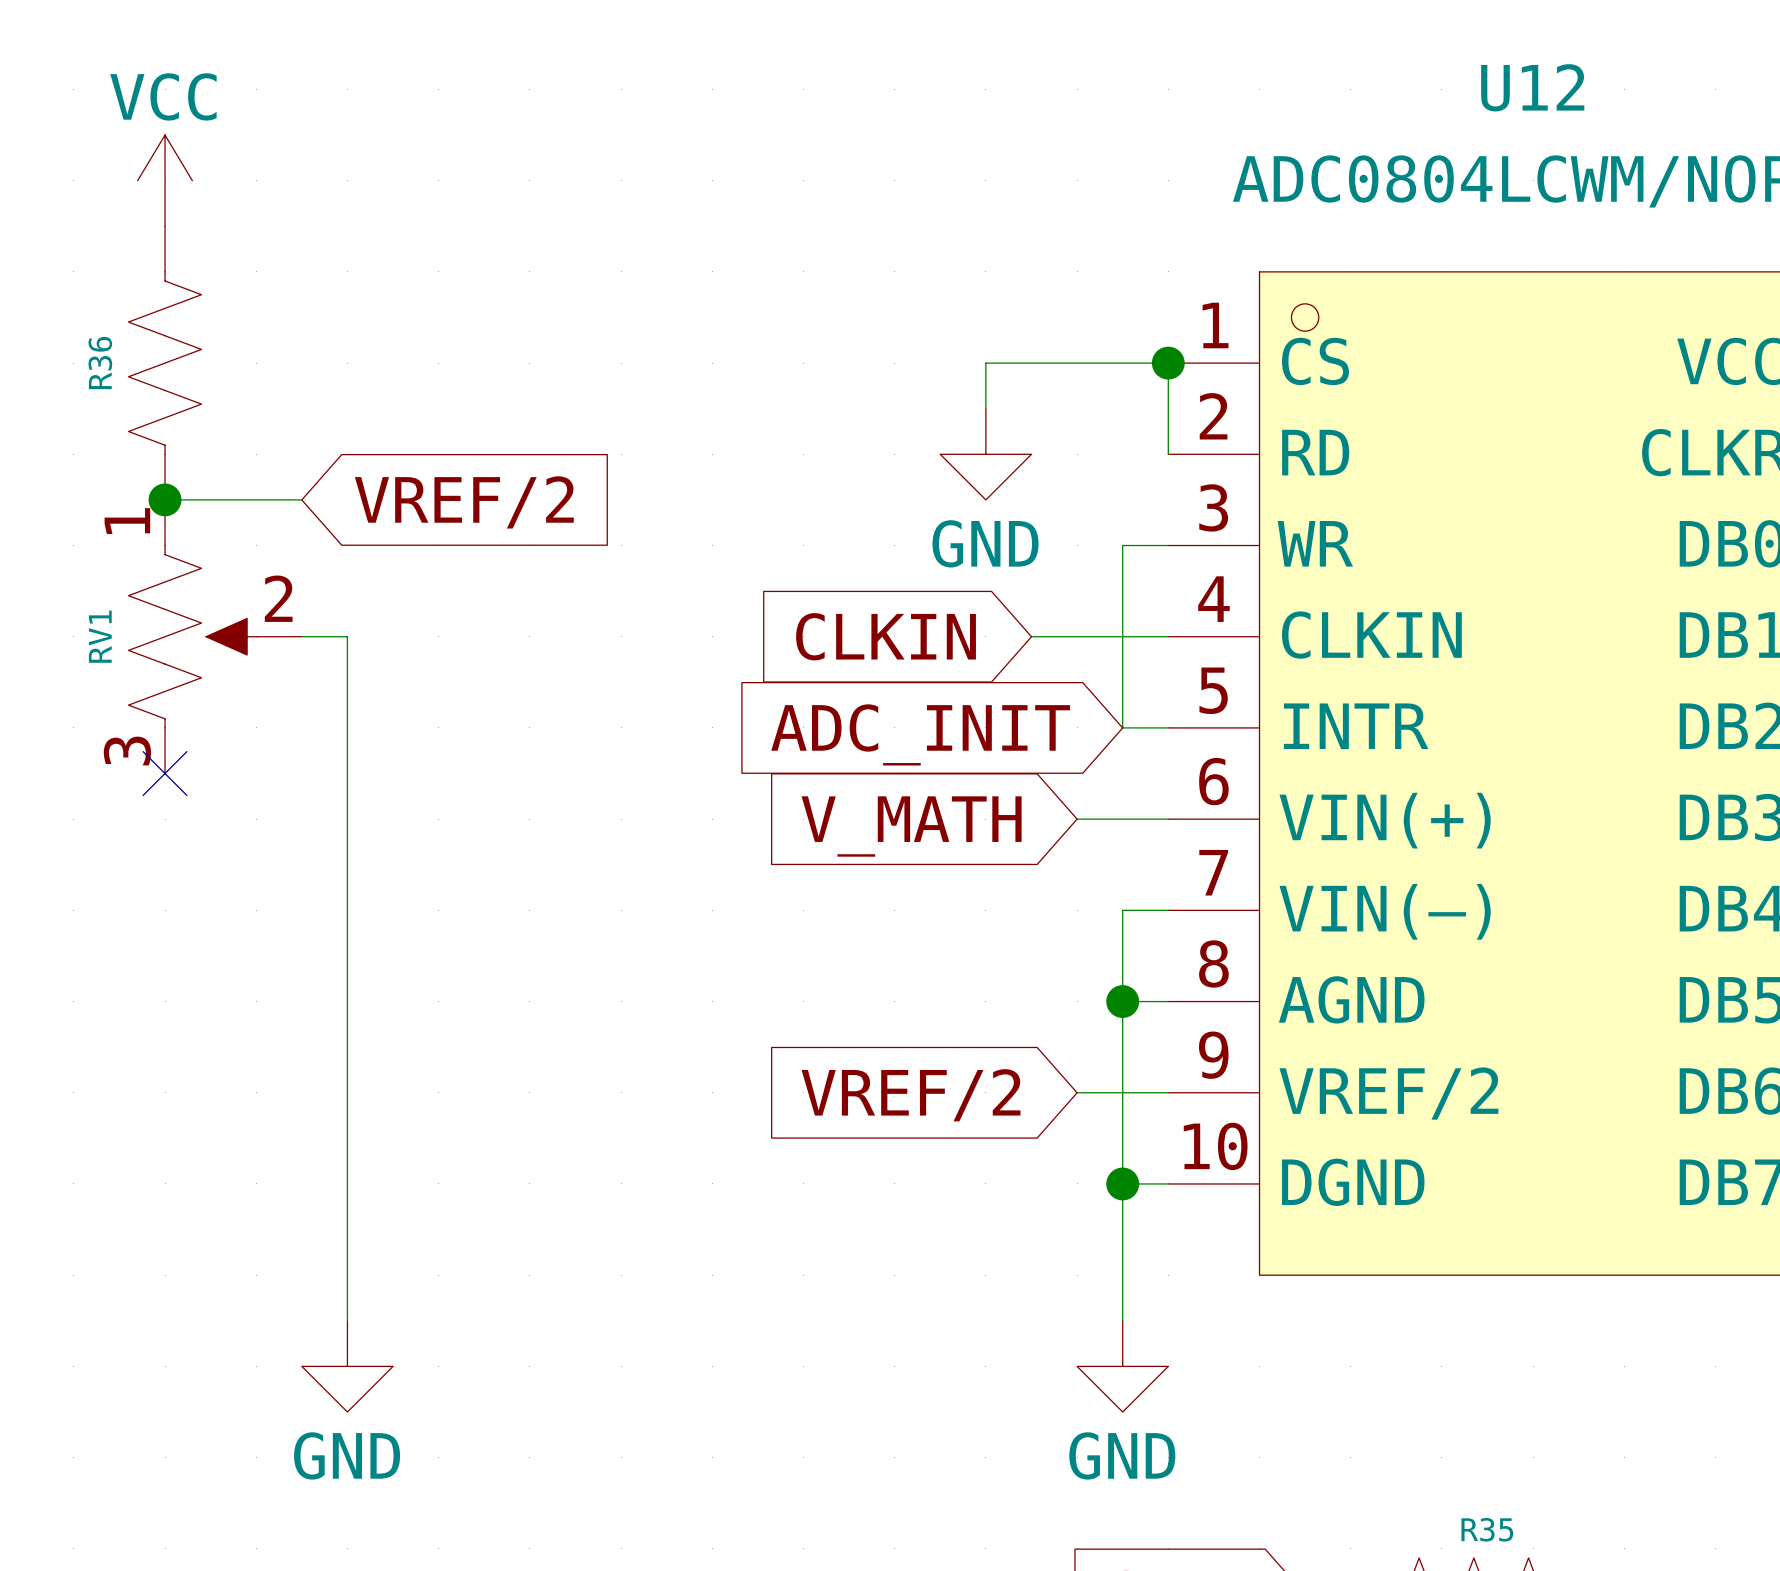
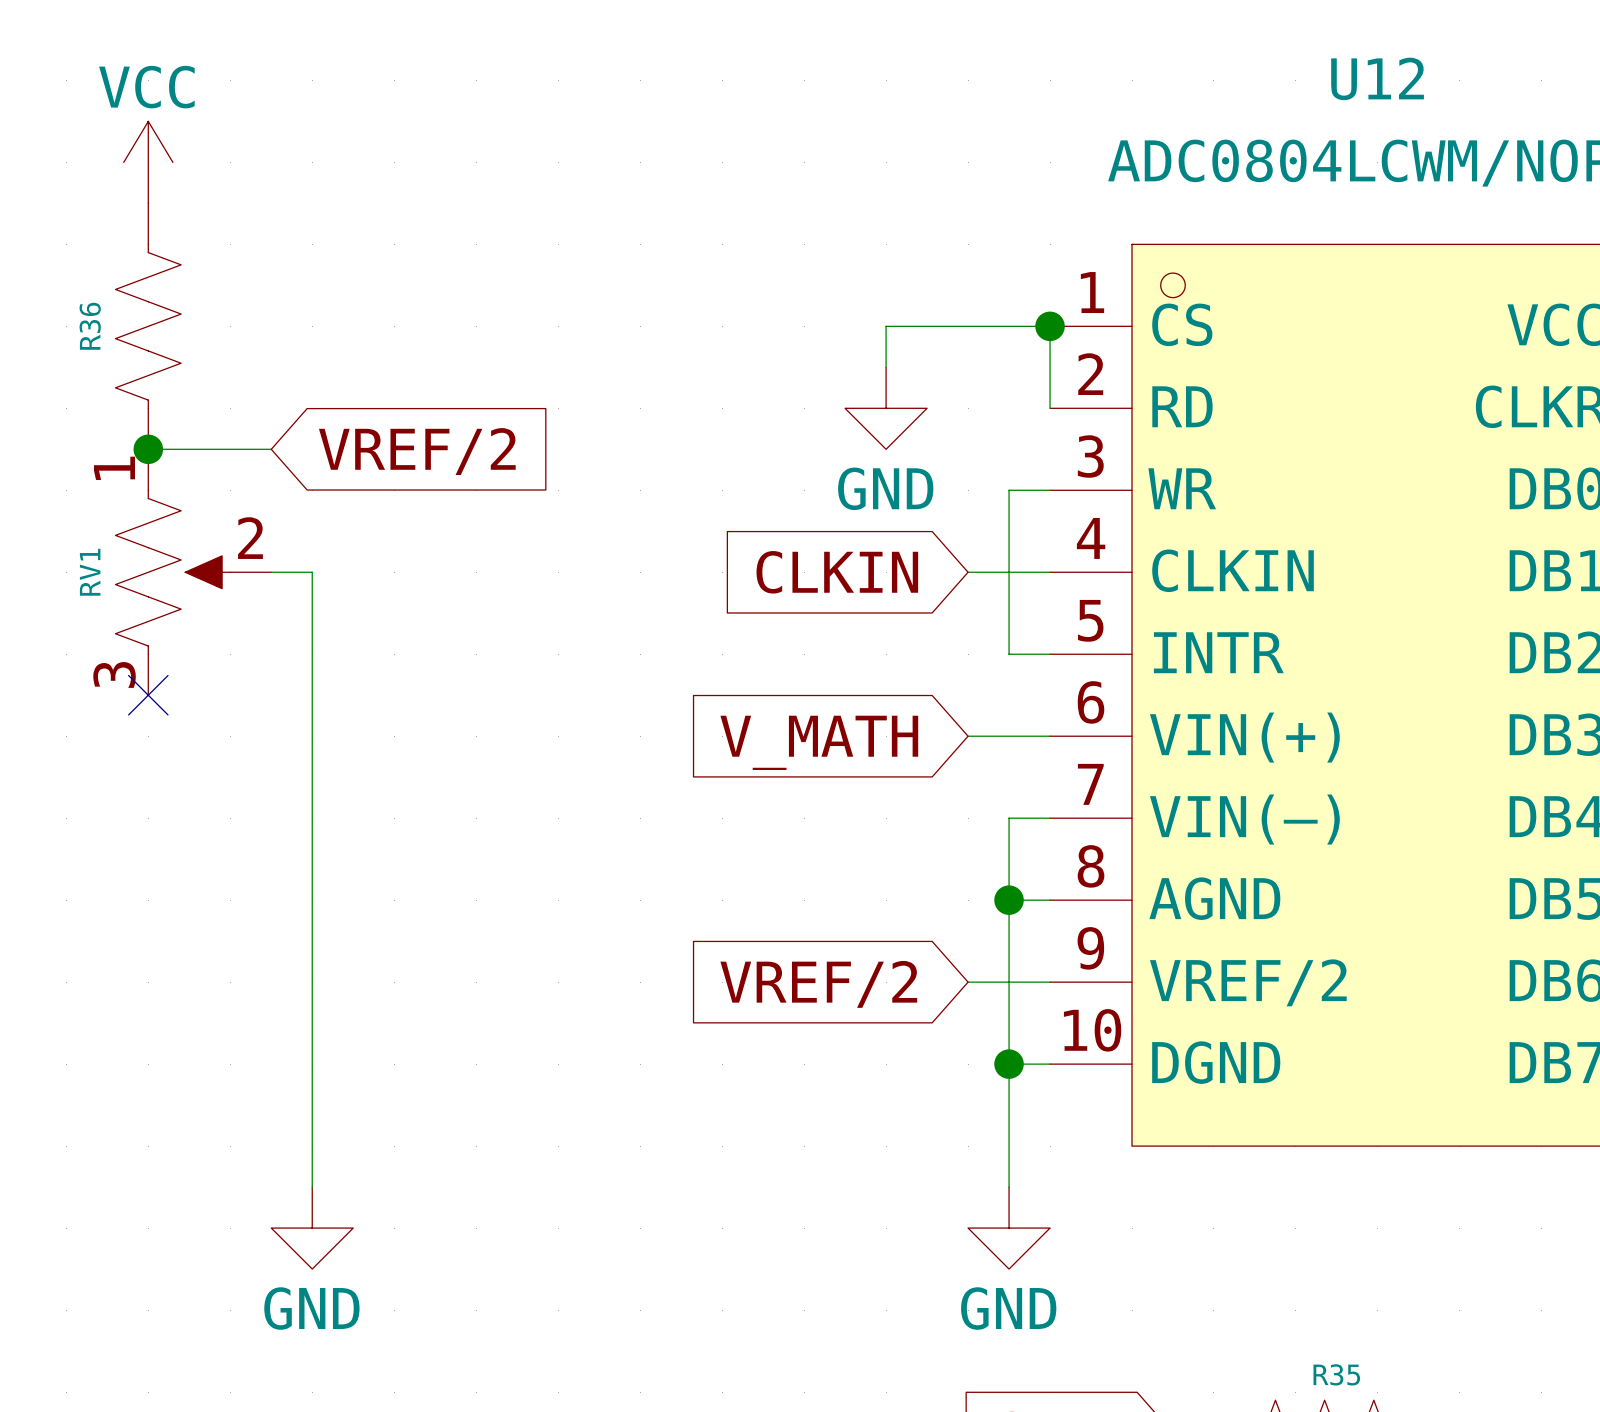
global label position: CLKIN (886, 636) -> CLKIN (837, 572)
wire: (1031, 636) (1077, 636) -> none
global label: ADC_INIT (920, 734) -> none

